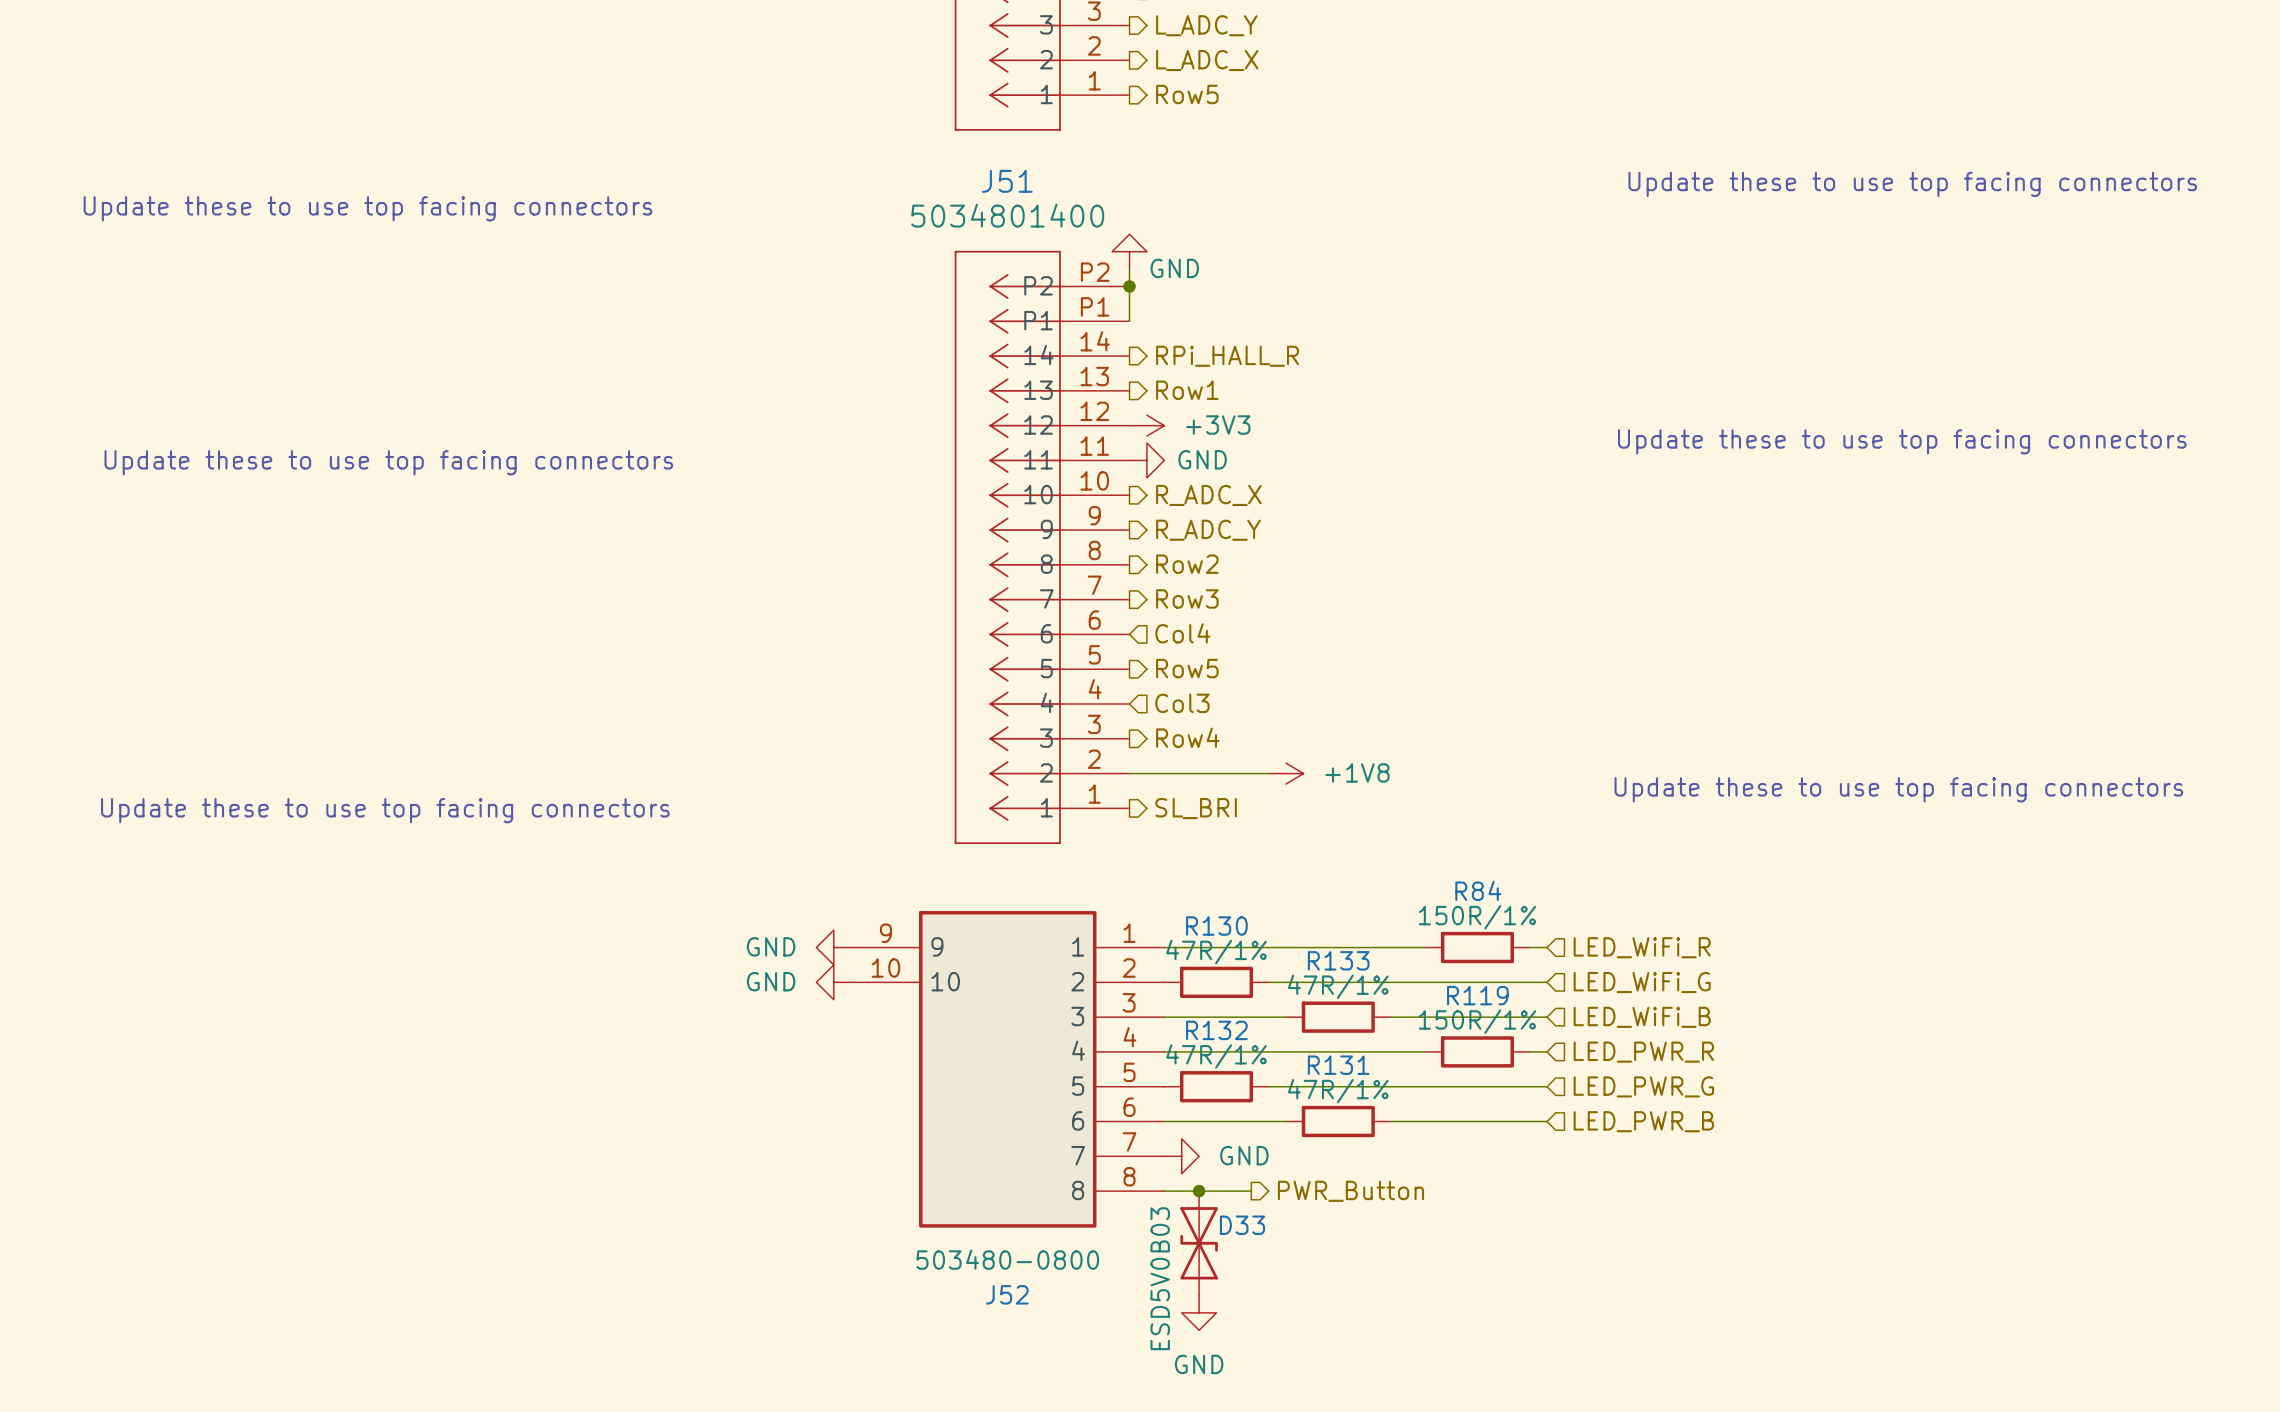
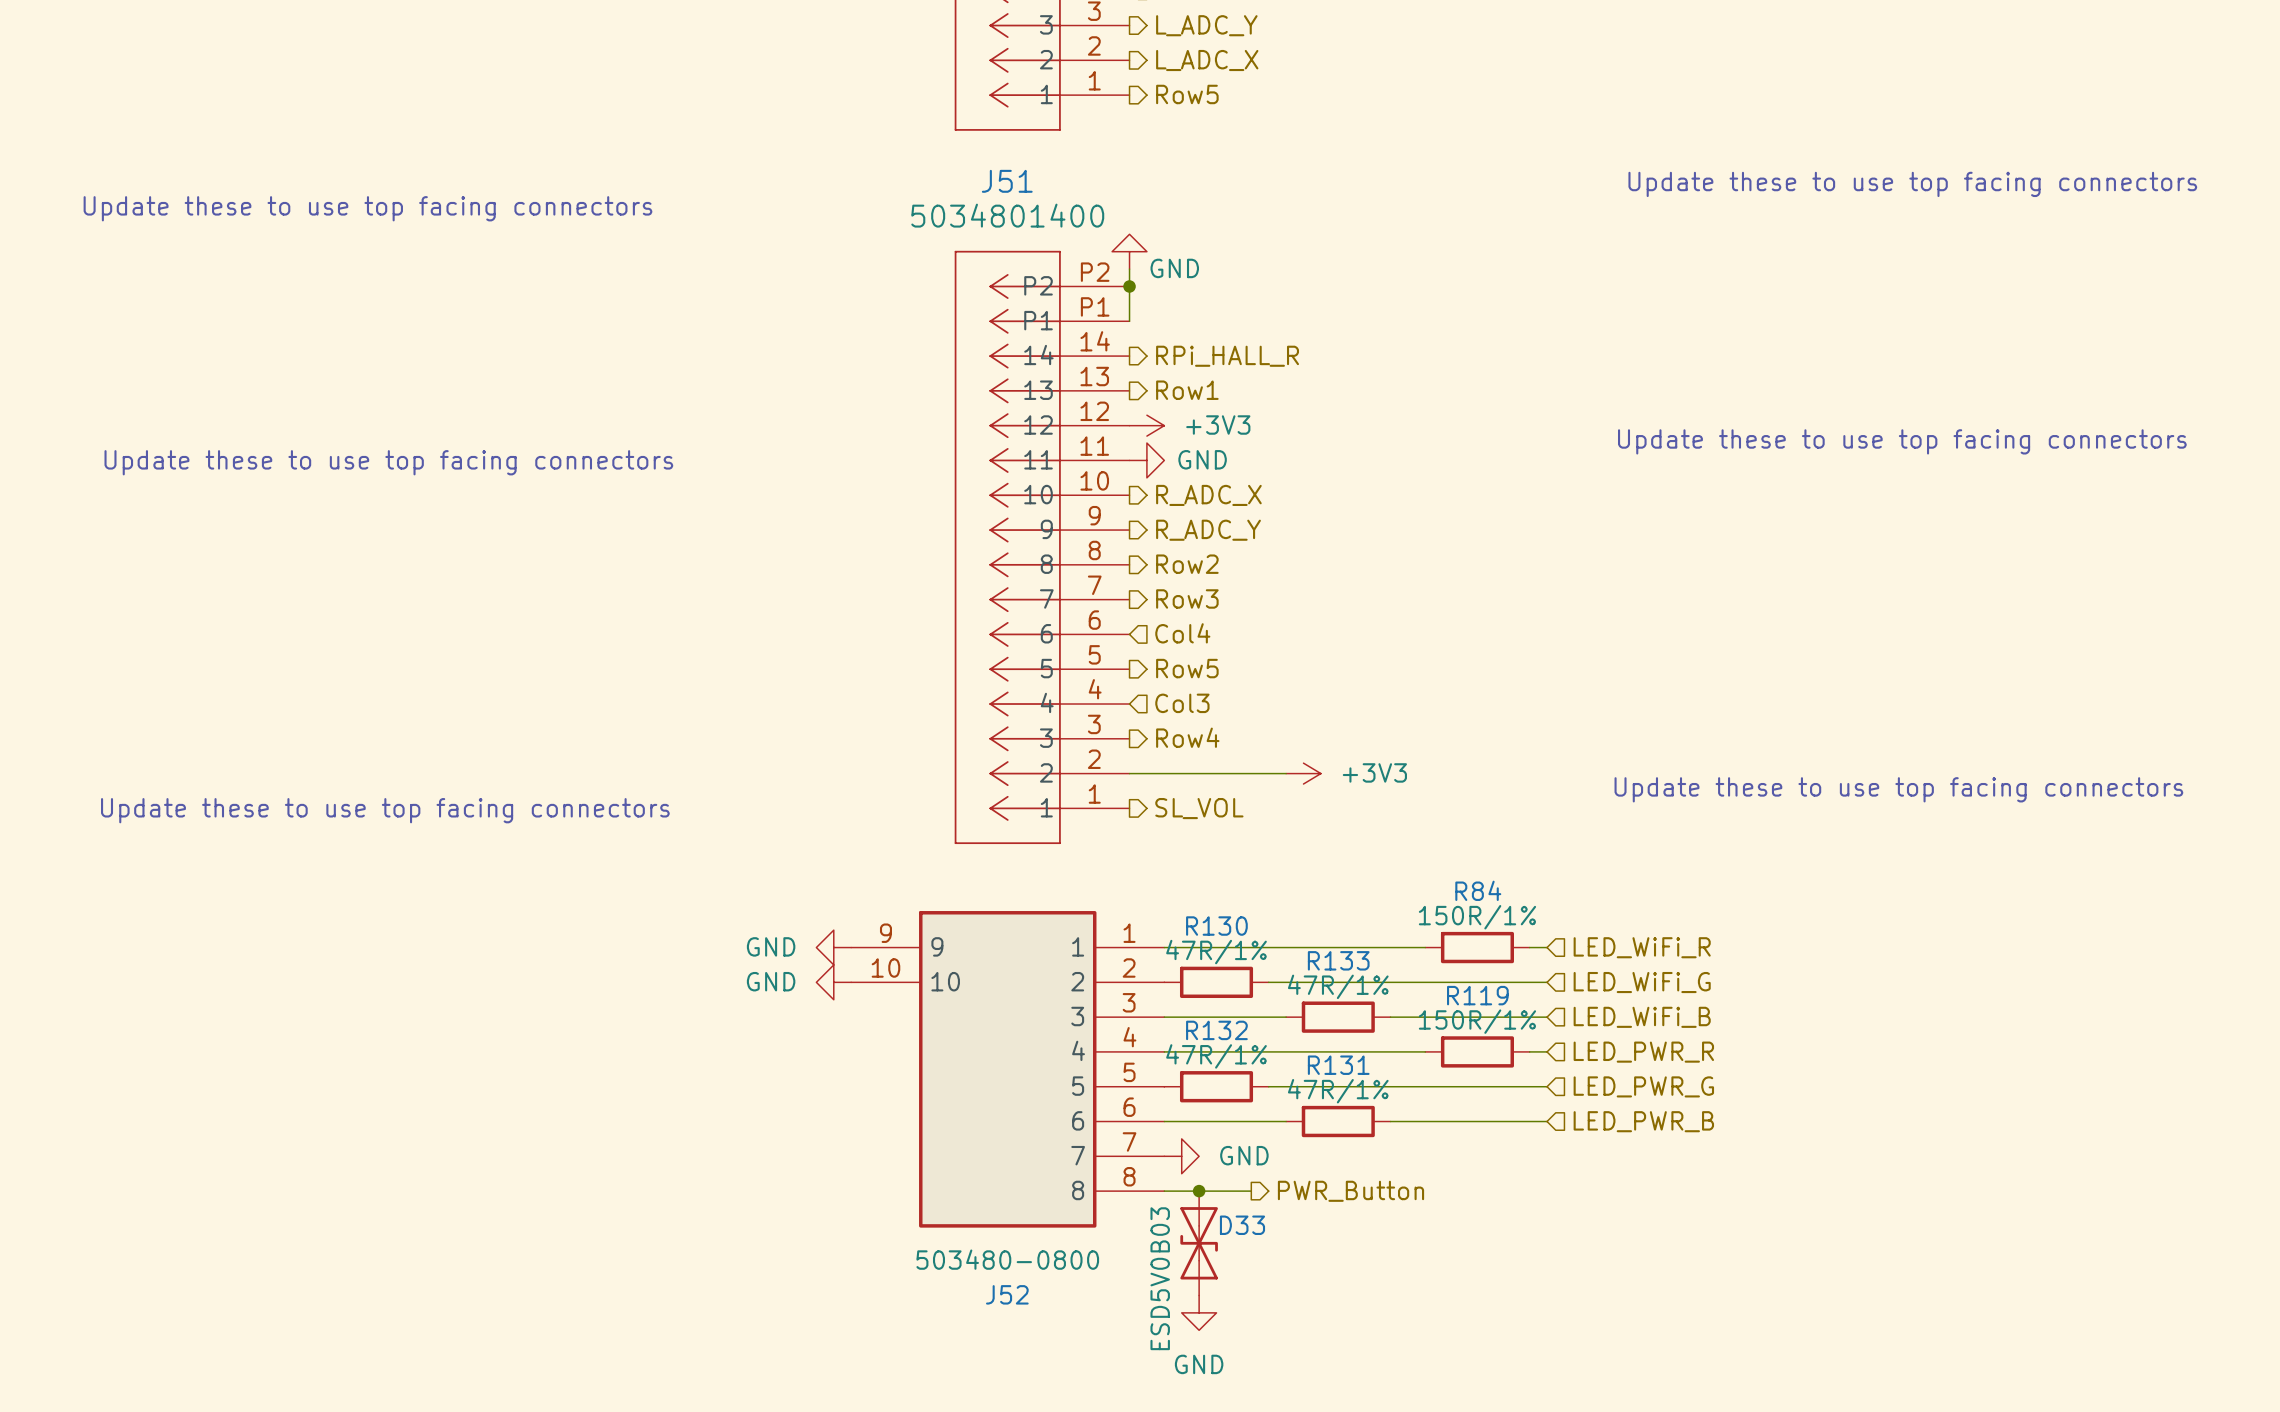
power symbol: +1V8 (1286, 773) -> none
power symbol: none -> +3V3 (1303, 773)
hierarchical label: SL_BRI (1196, 808) -> SL_VOL (1199, 808)

